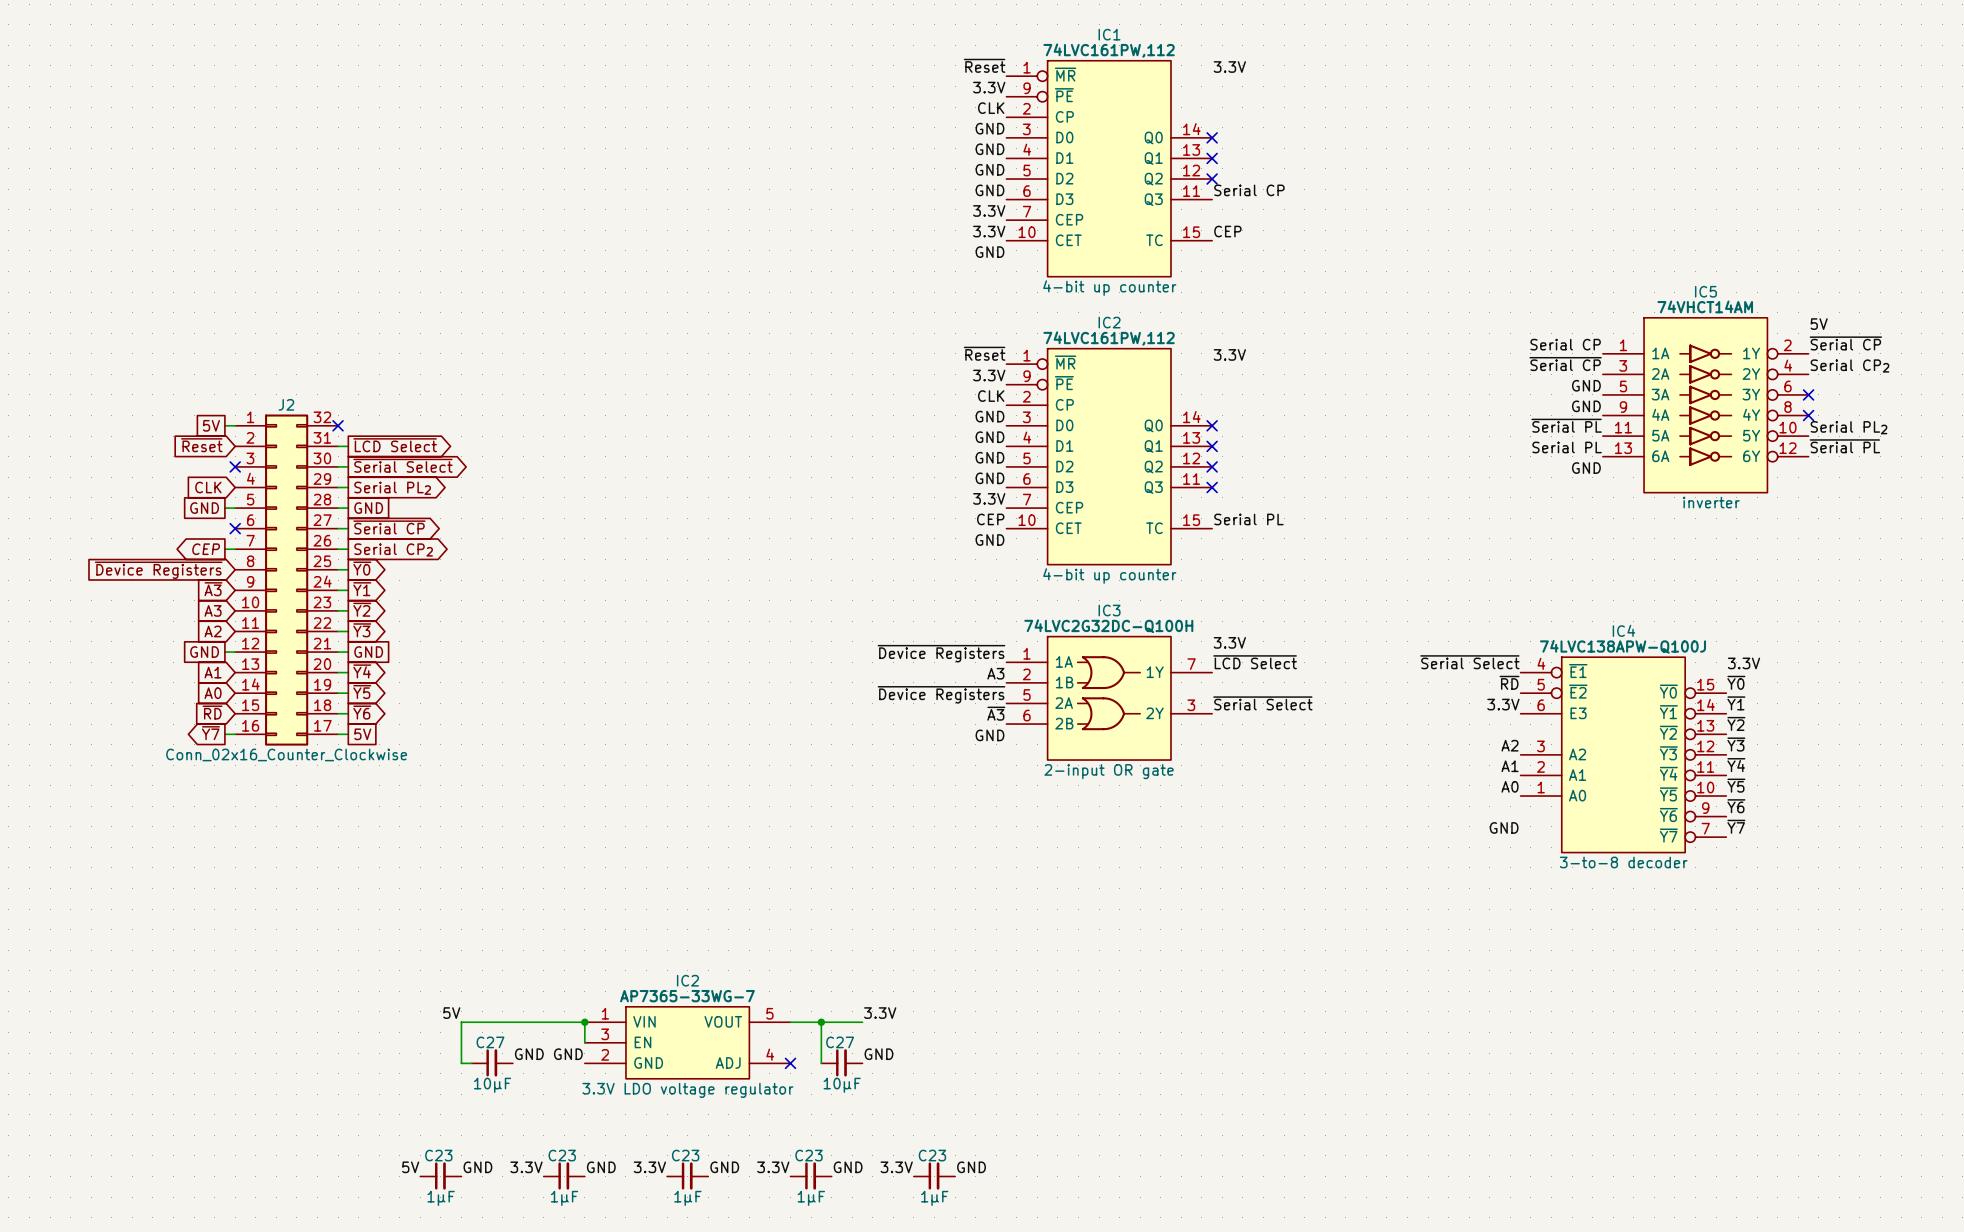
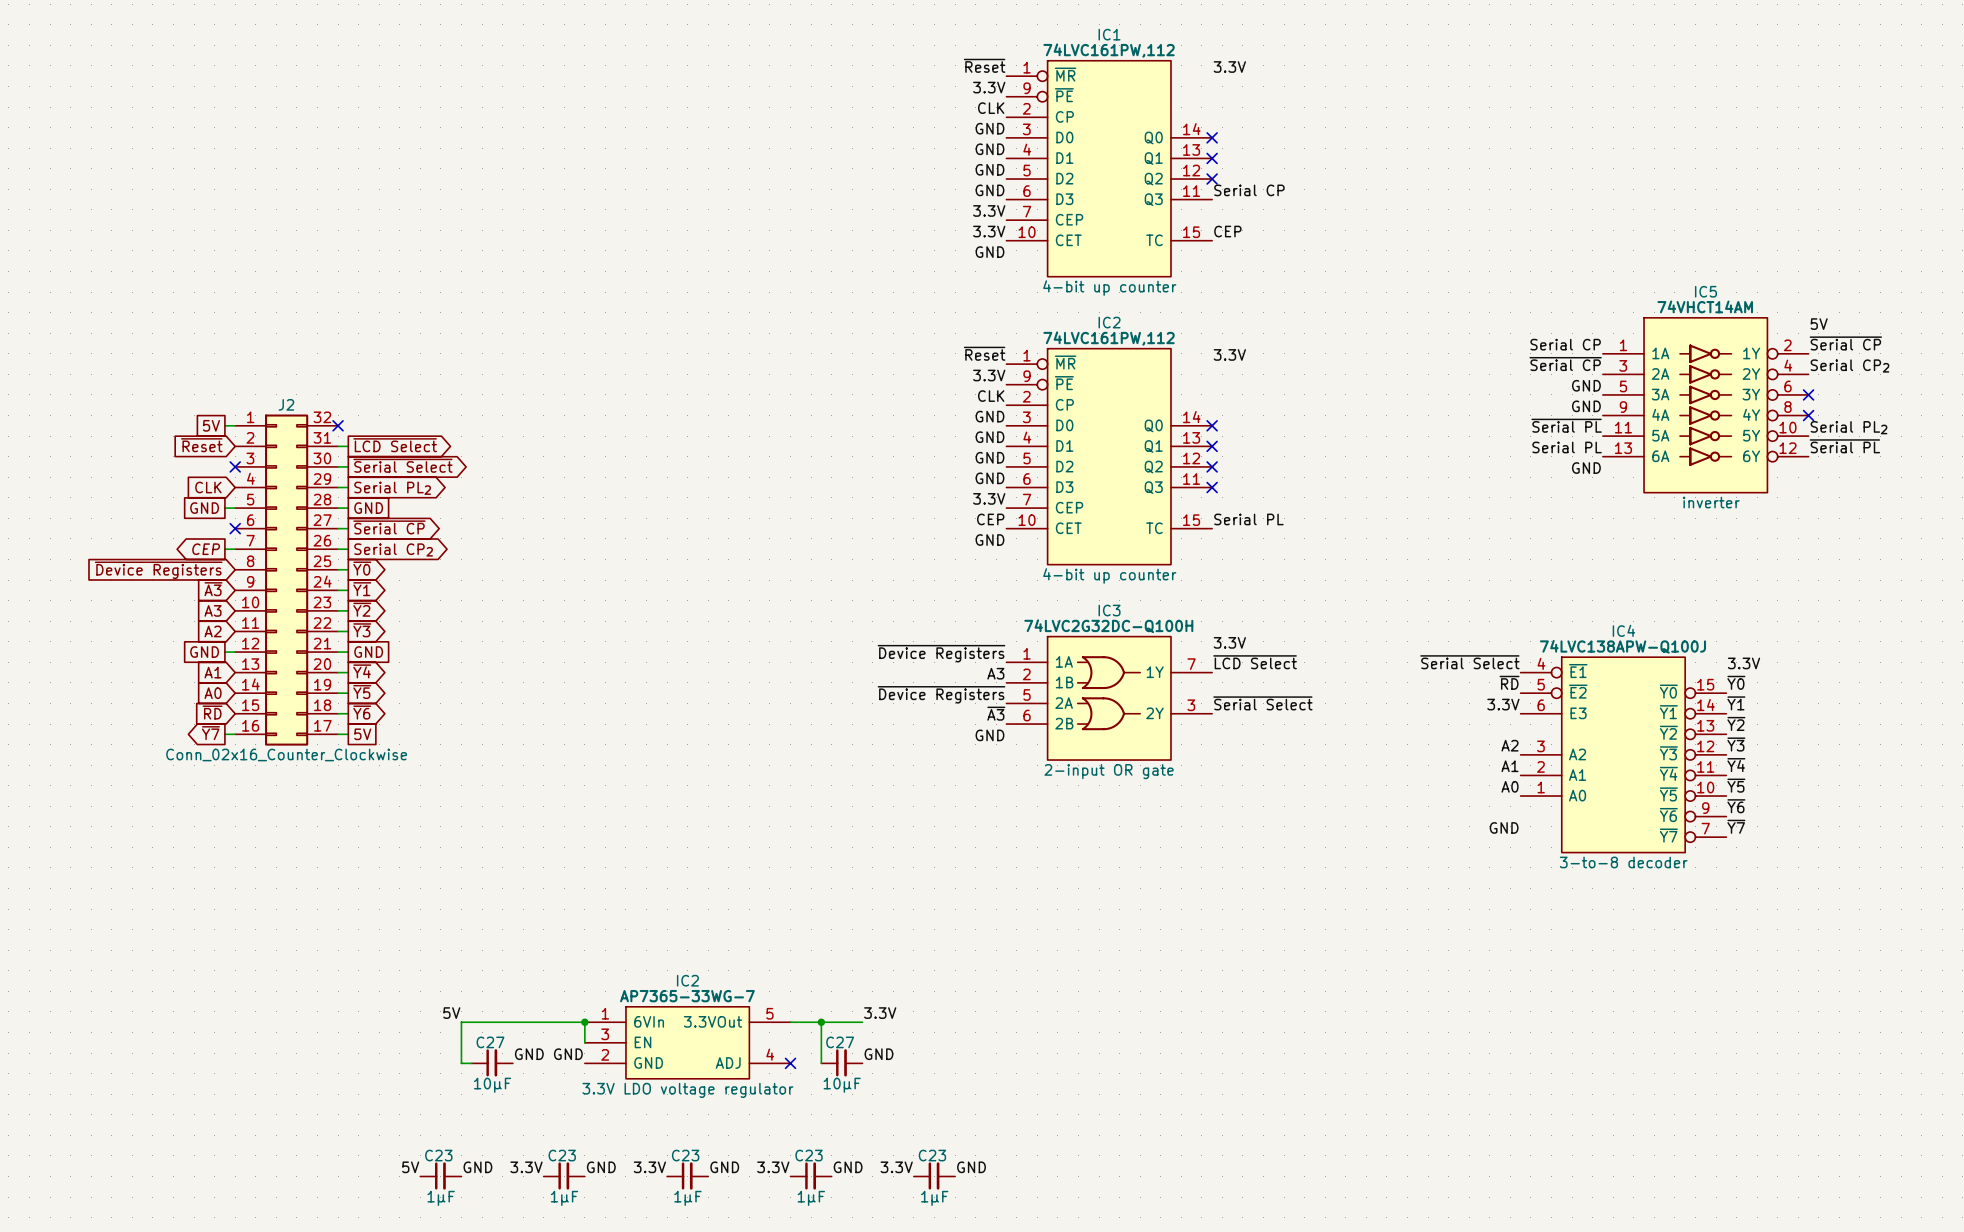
IC2 pin name: VIN (644, 1021) -> 6VIn (649, 1021)
IC2 pin name: VOUT (723, 1021) -> 3.3VOut (713, 1021)

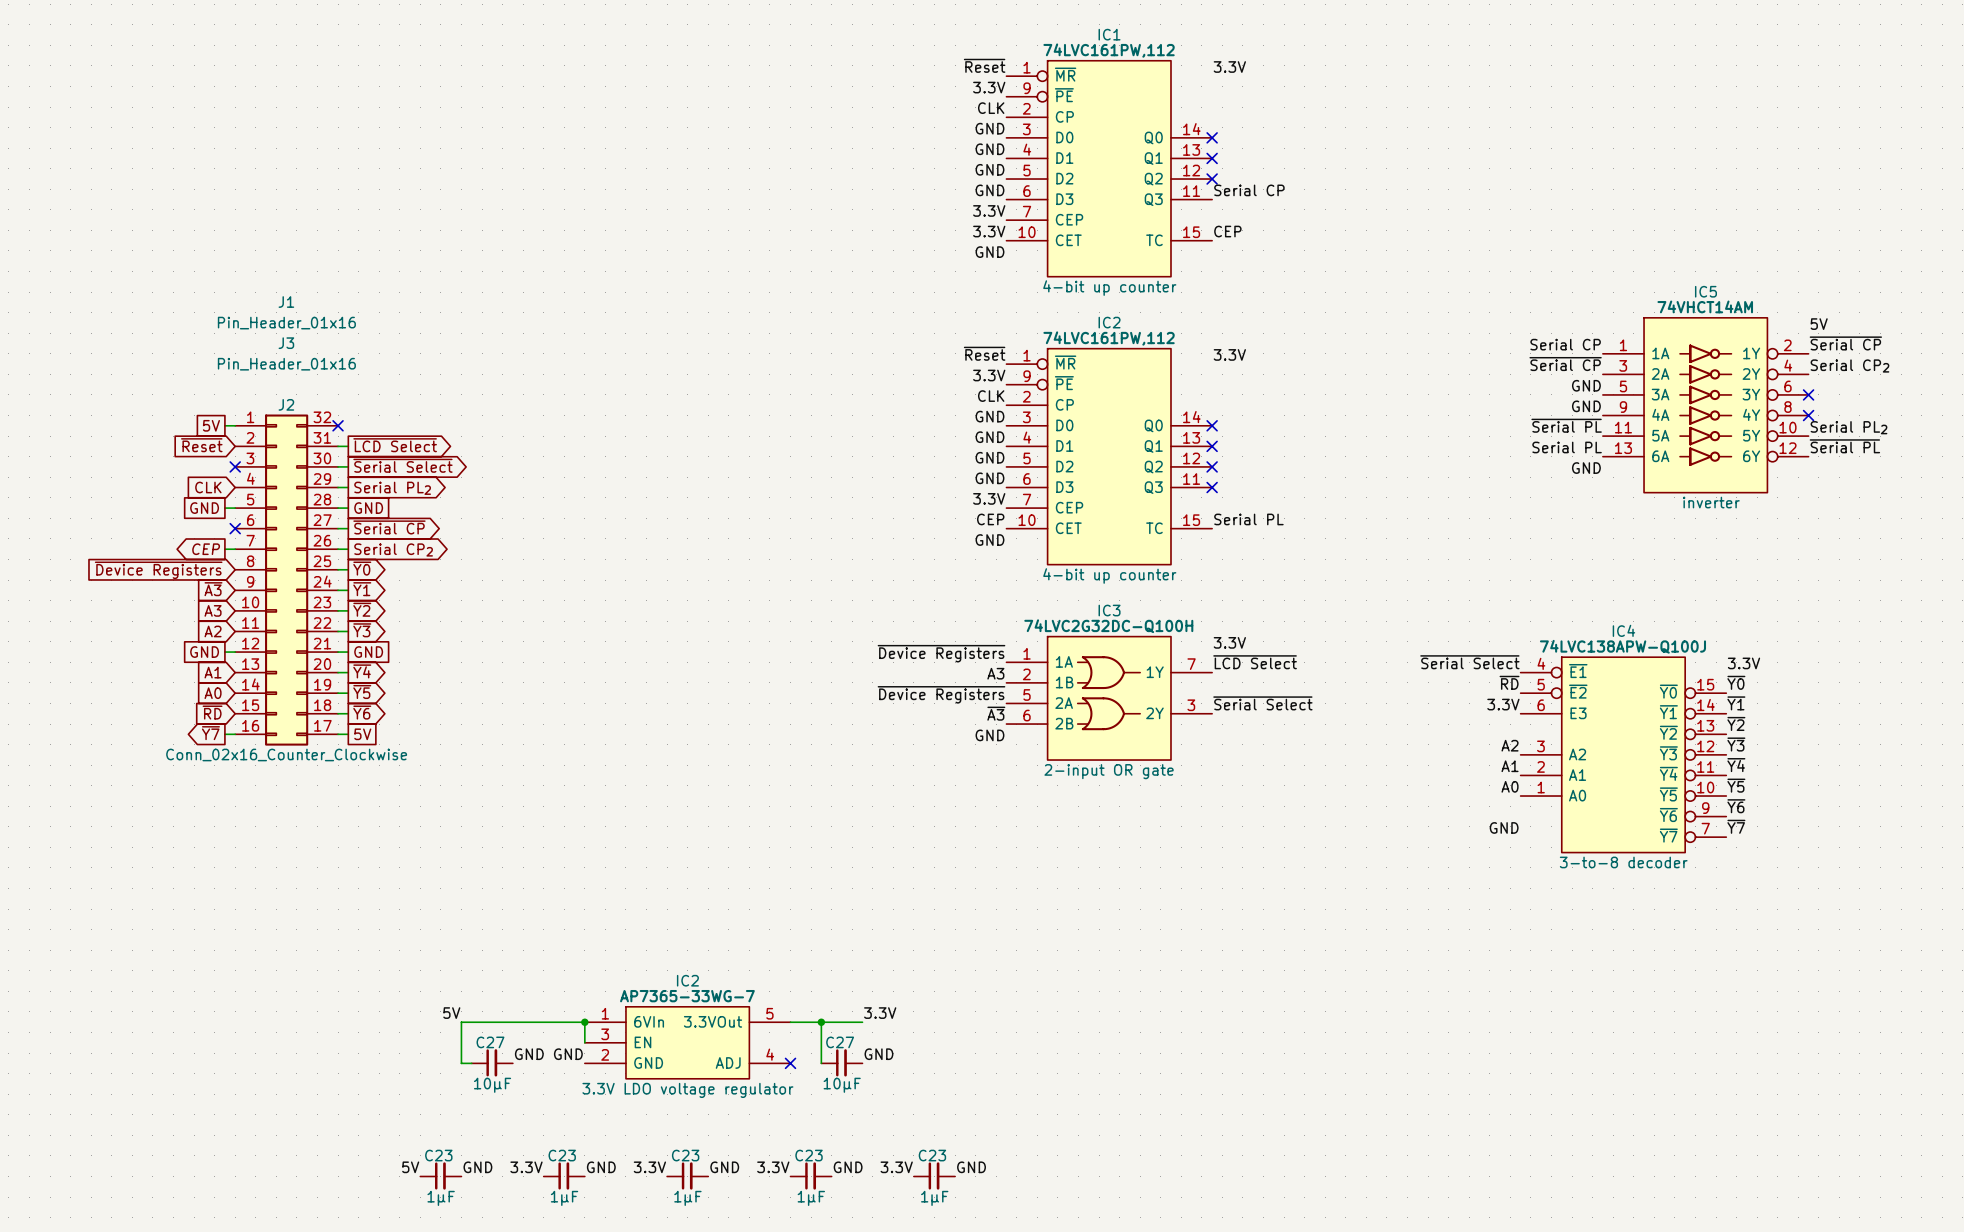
J1: none -> Pin_Header_01x16 (286, 312)
J3: none -> Pin_Header_01x16 (286, 353)

